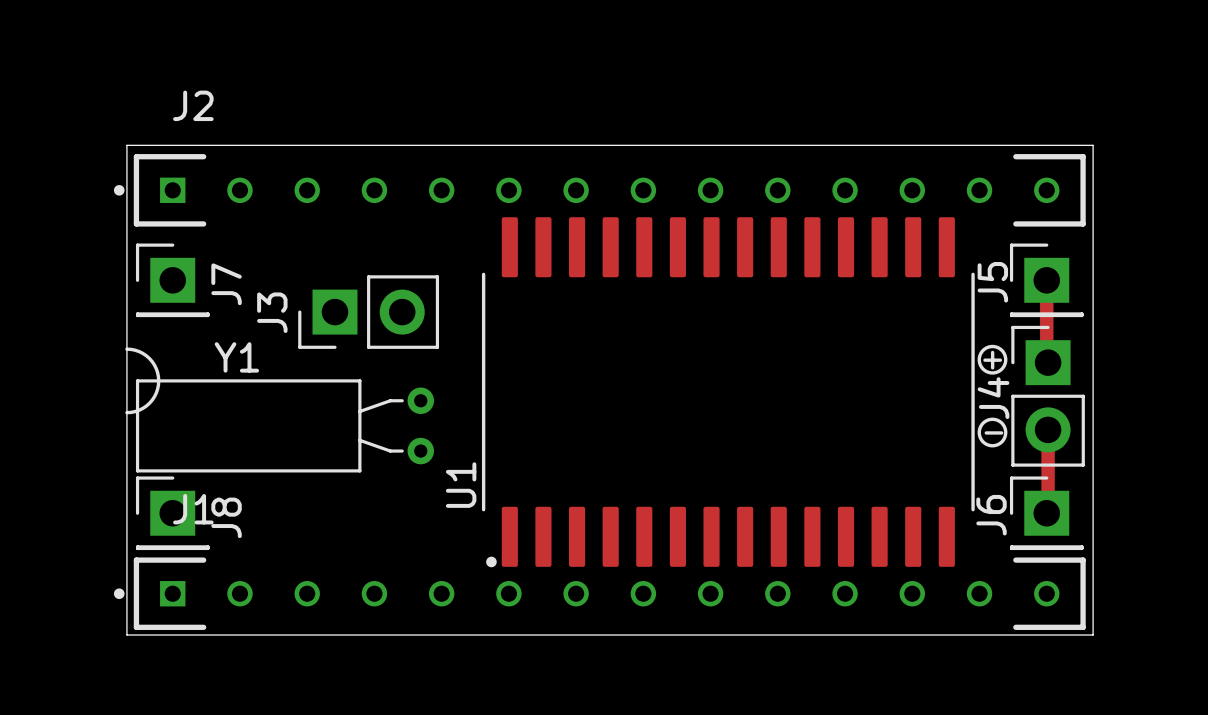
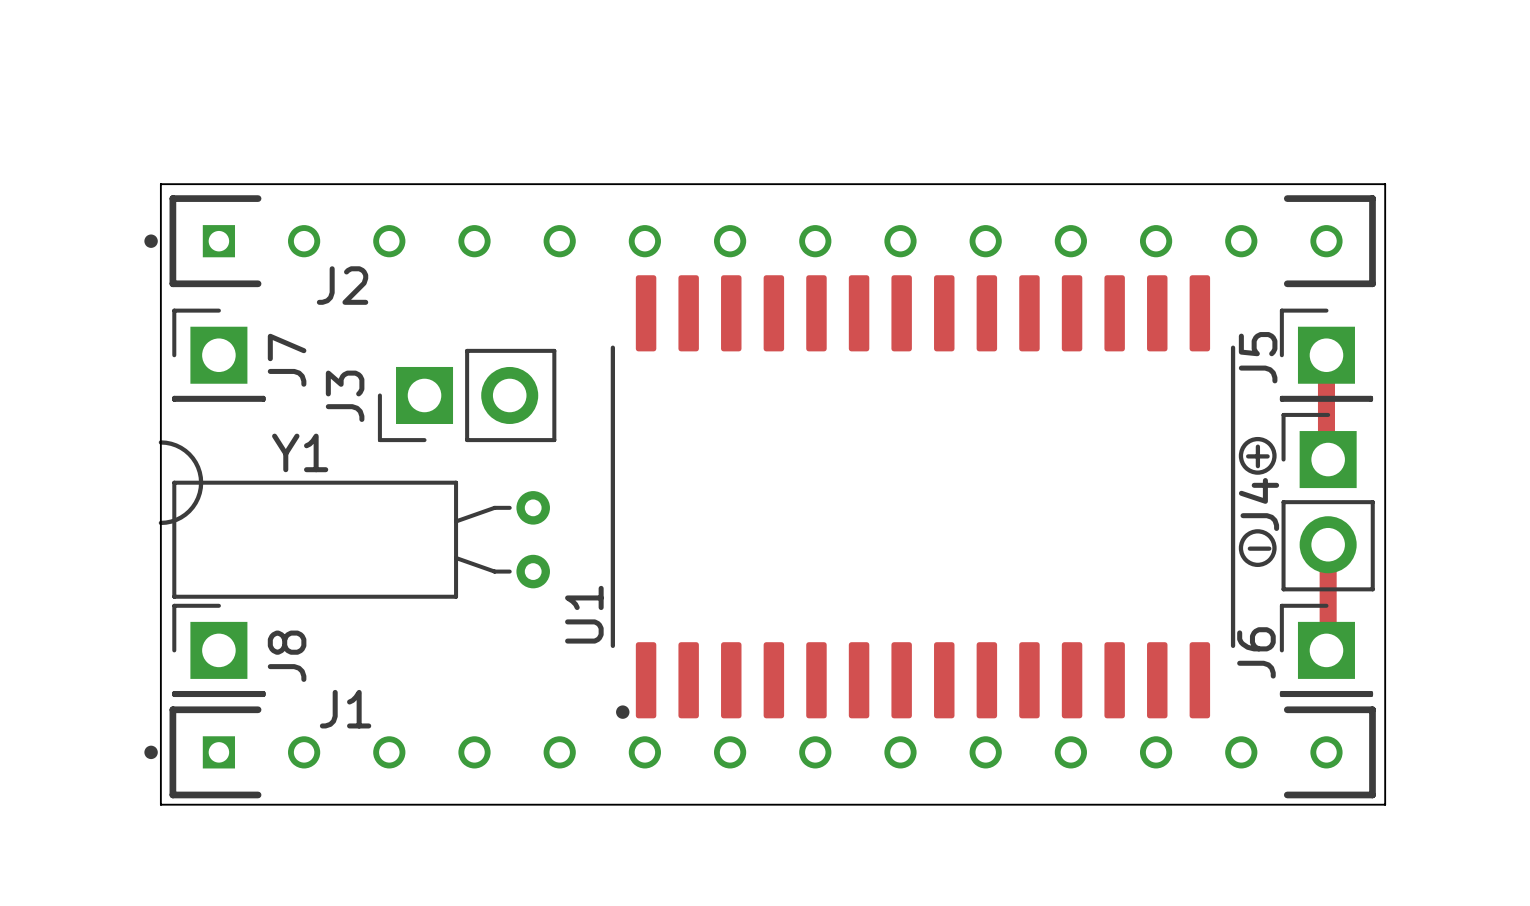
J2 name position: J2 (193, 105) -> J2 (342, 285)
J1 name position: J1 (193, 509) -> J1 (345, 709)

